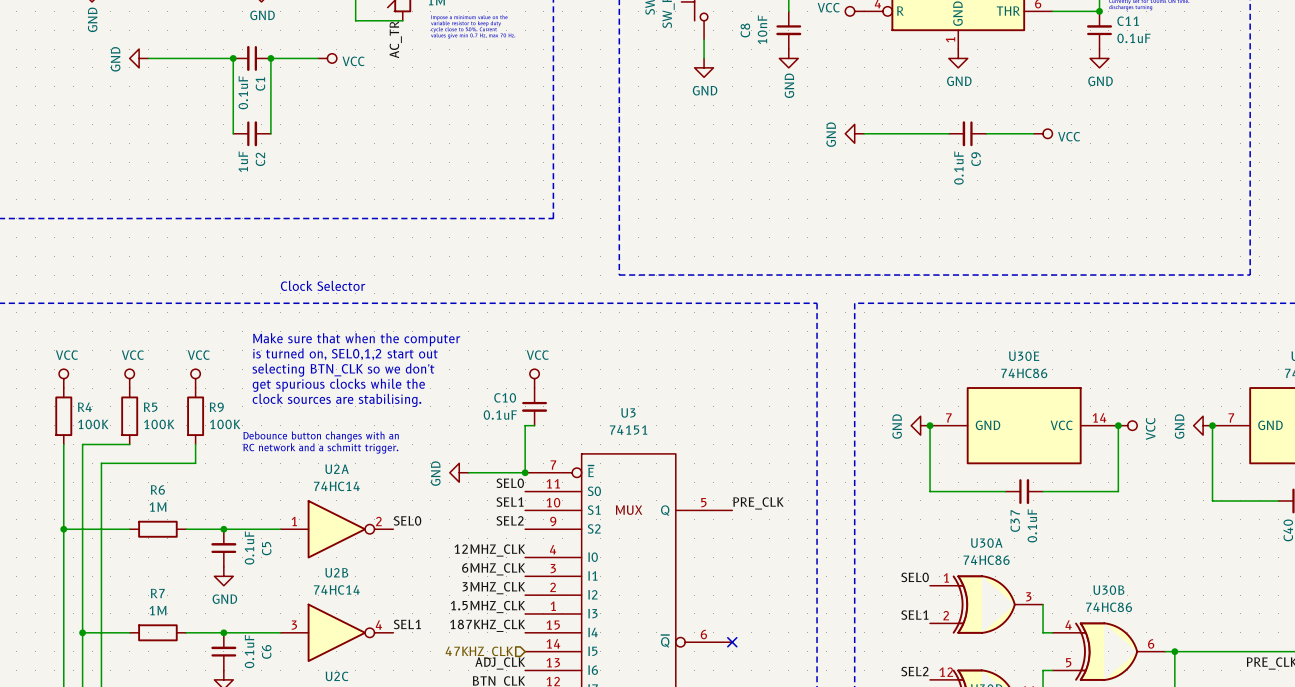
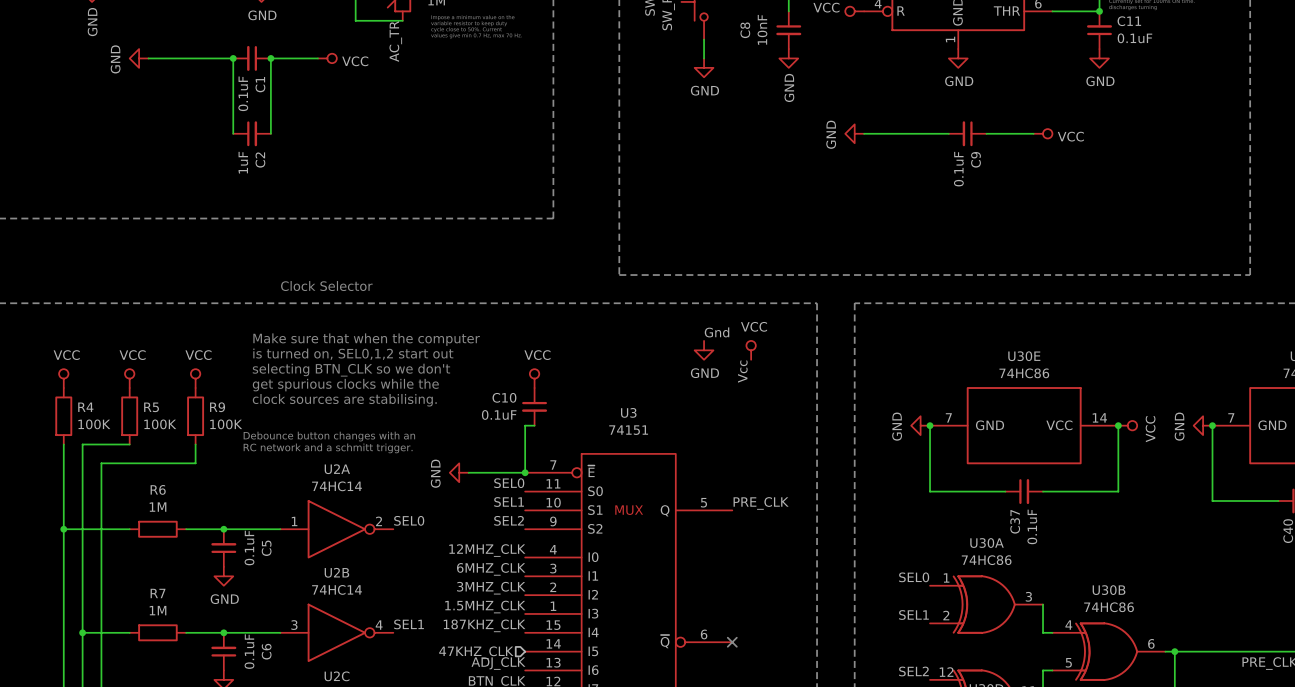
label: none -> Gnd (717, 332)
power symbol: none -> GND (704, 350)
power symbol: none -> VCC (751, 350)
label: none -> Vcc (742, 371)

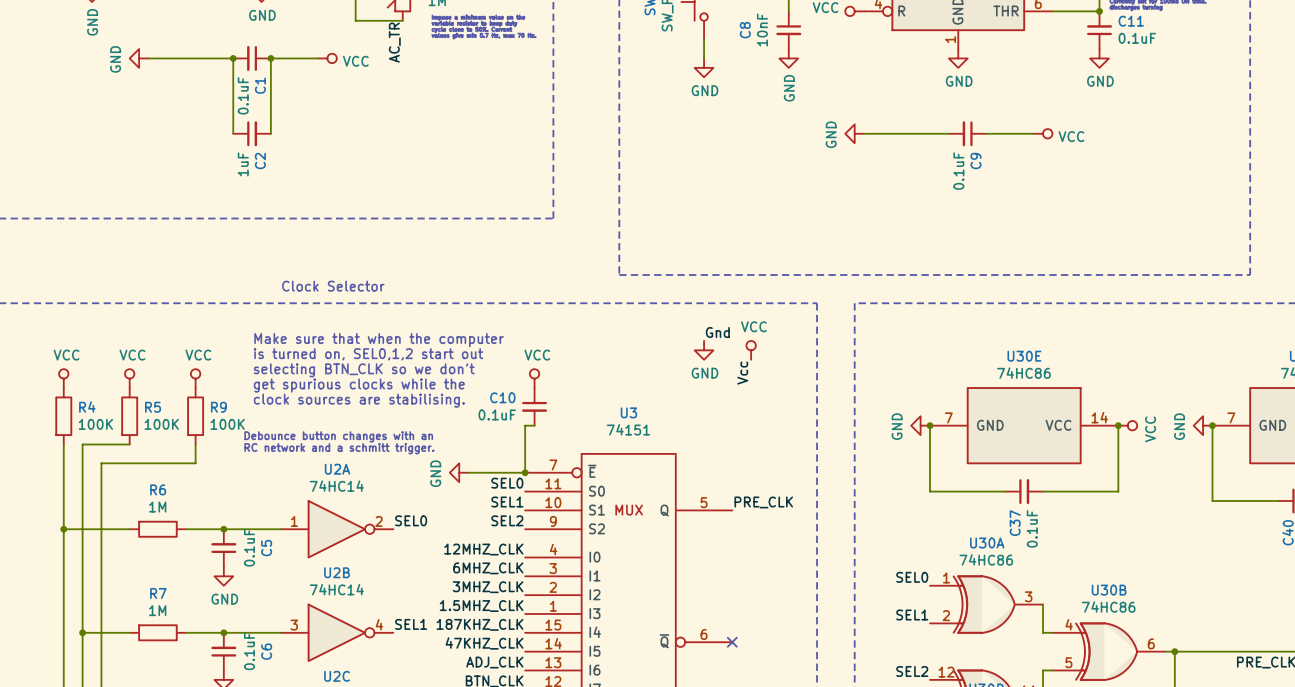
label: none -> 47KHZ_CLK (484, 643)
hierarchical label: 47KHZ_CLK (476, 652) -> none

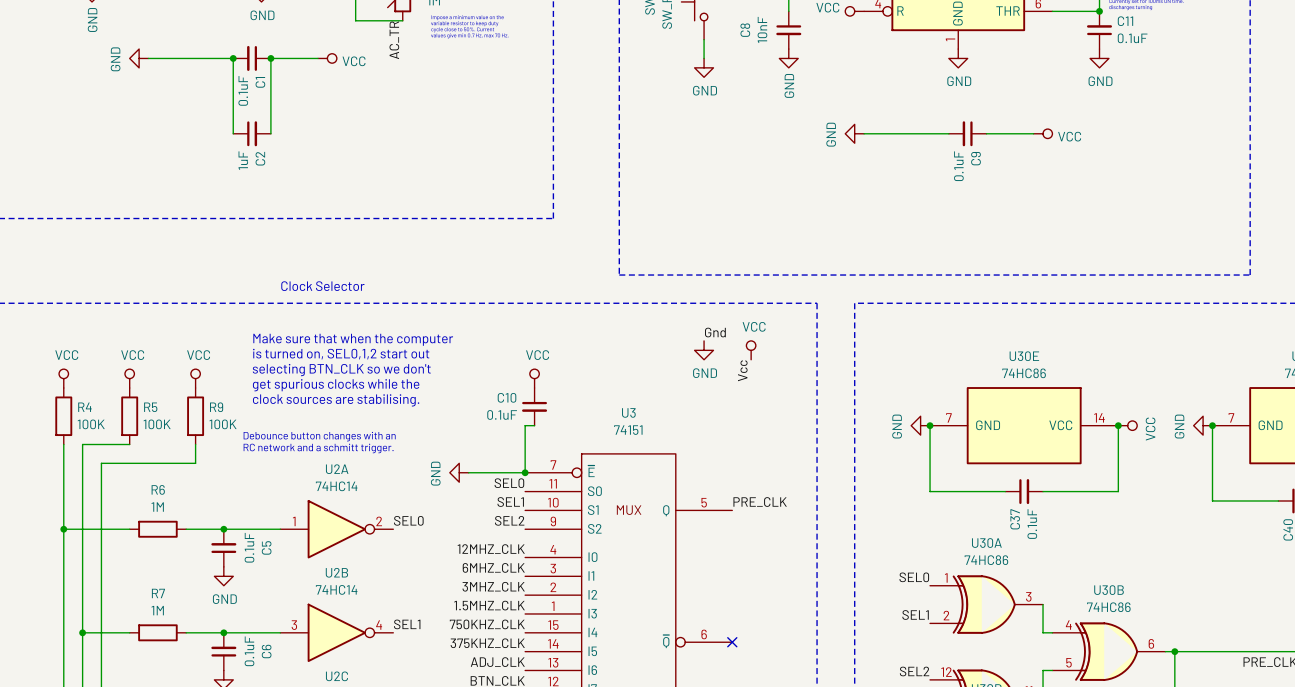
label: 187KHZ_CLK (480, 624) -> 750KHZ_CLK (487, 624)
label: 47KHZ_CLK (484, 643) -> 375KHZ_CLK (487, 643)

